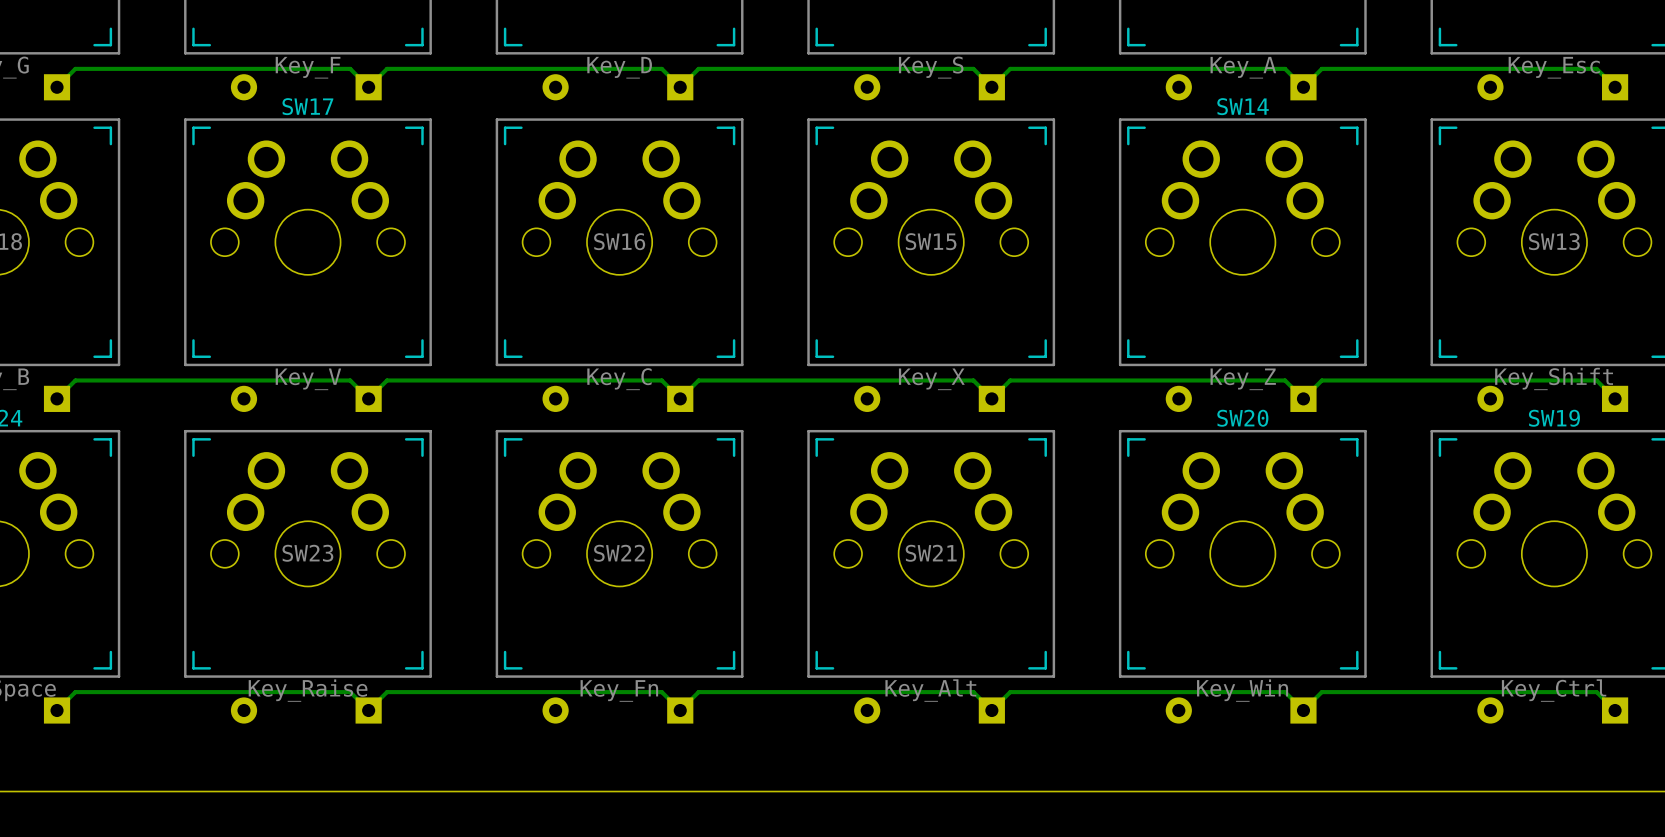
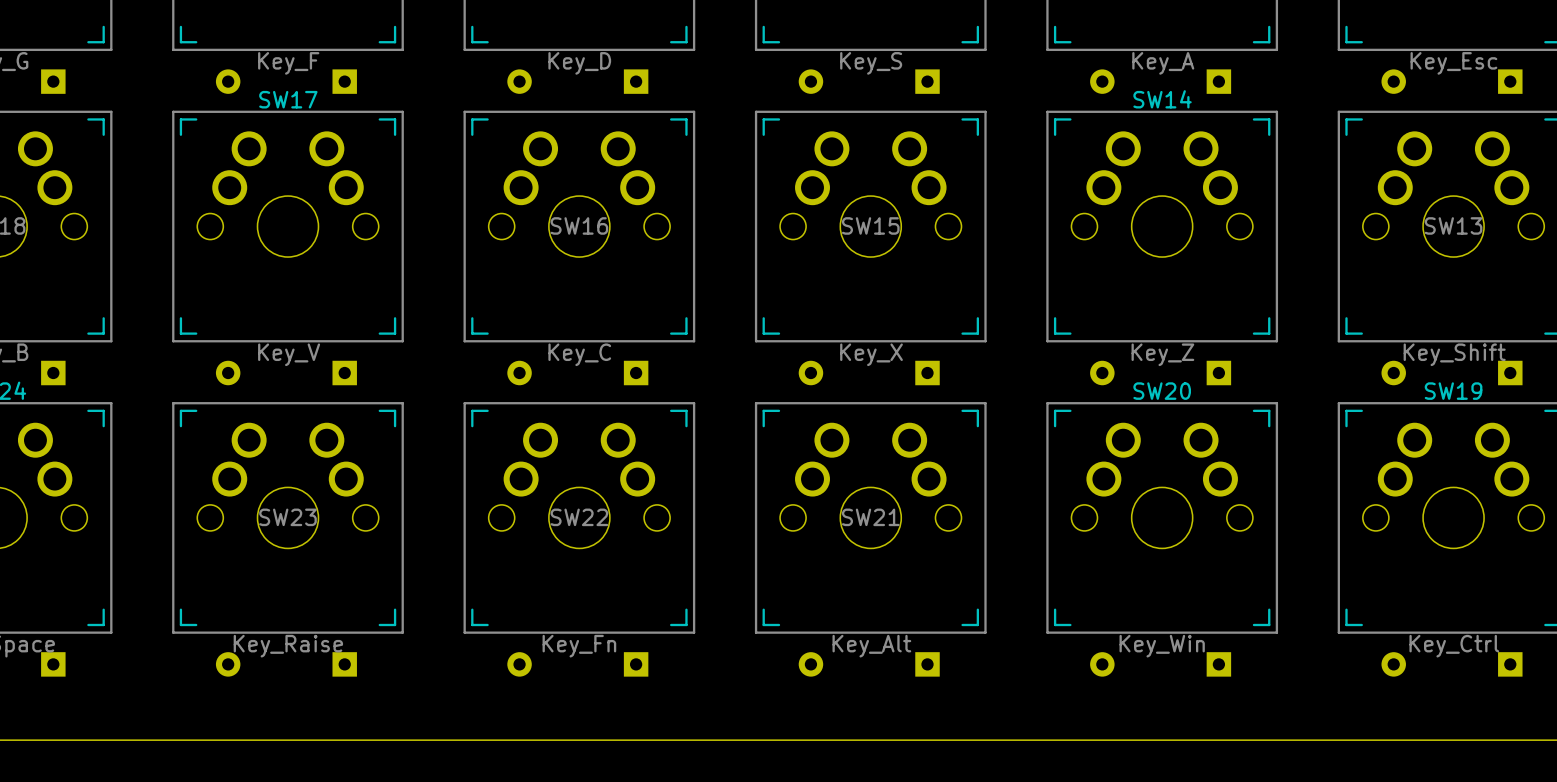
track: (1615, 87) (1596, 68) (1321, 68) (1303, 87) (1285, 68) (1010, 68) (991, 87) (973, 68) (698, 68) (680, 87) (661, 68) (387, 68) (368, 87) (350, 68) (75, 68) (57, 87) -> none
track: (1615, 398) (1596, 380) (1321, 380) (1303, 398) (1285, 380) (1010, 380) (991, 398) (973, 380) (698, 380) (680, 398) (661, 380) (387, 380) (368, 398) (350, 380) (75, 380) (57, 398) -> none
track: (1615, 710) (1596, 692) (1321, 692) (1303, 710) (1285, 692) (1010, 692) (991, 710) (973, 692) (698, 692) (680, 710) (661, 692) (387, 692) (368, 710) (350, 692) (75, 692) (57, 710) -> none

